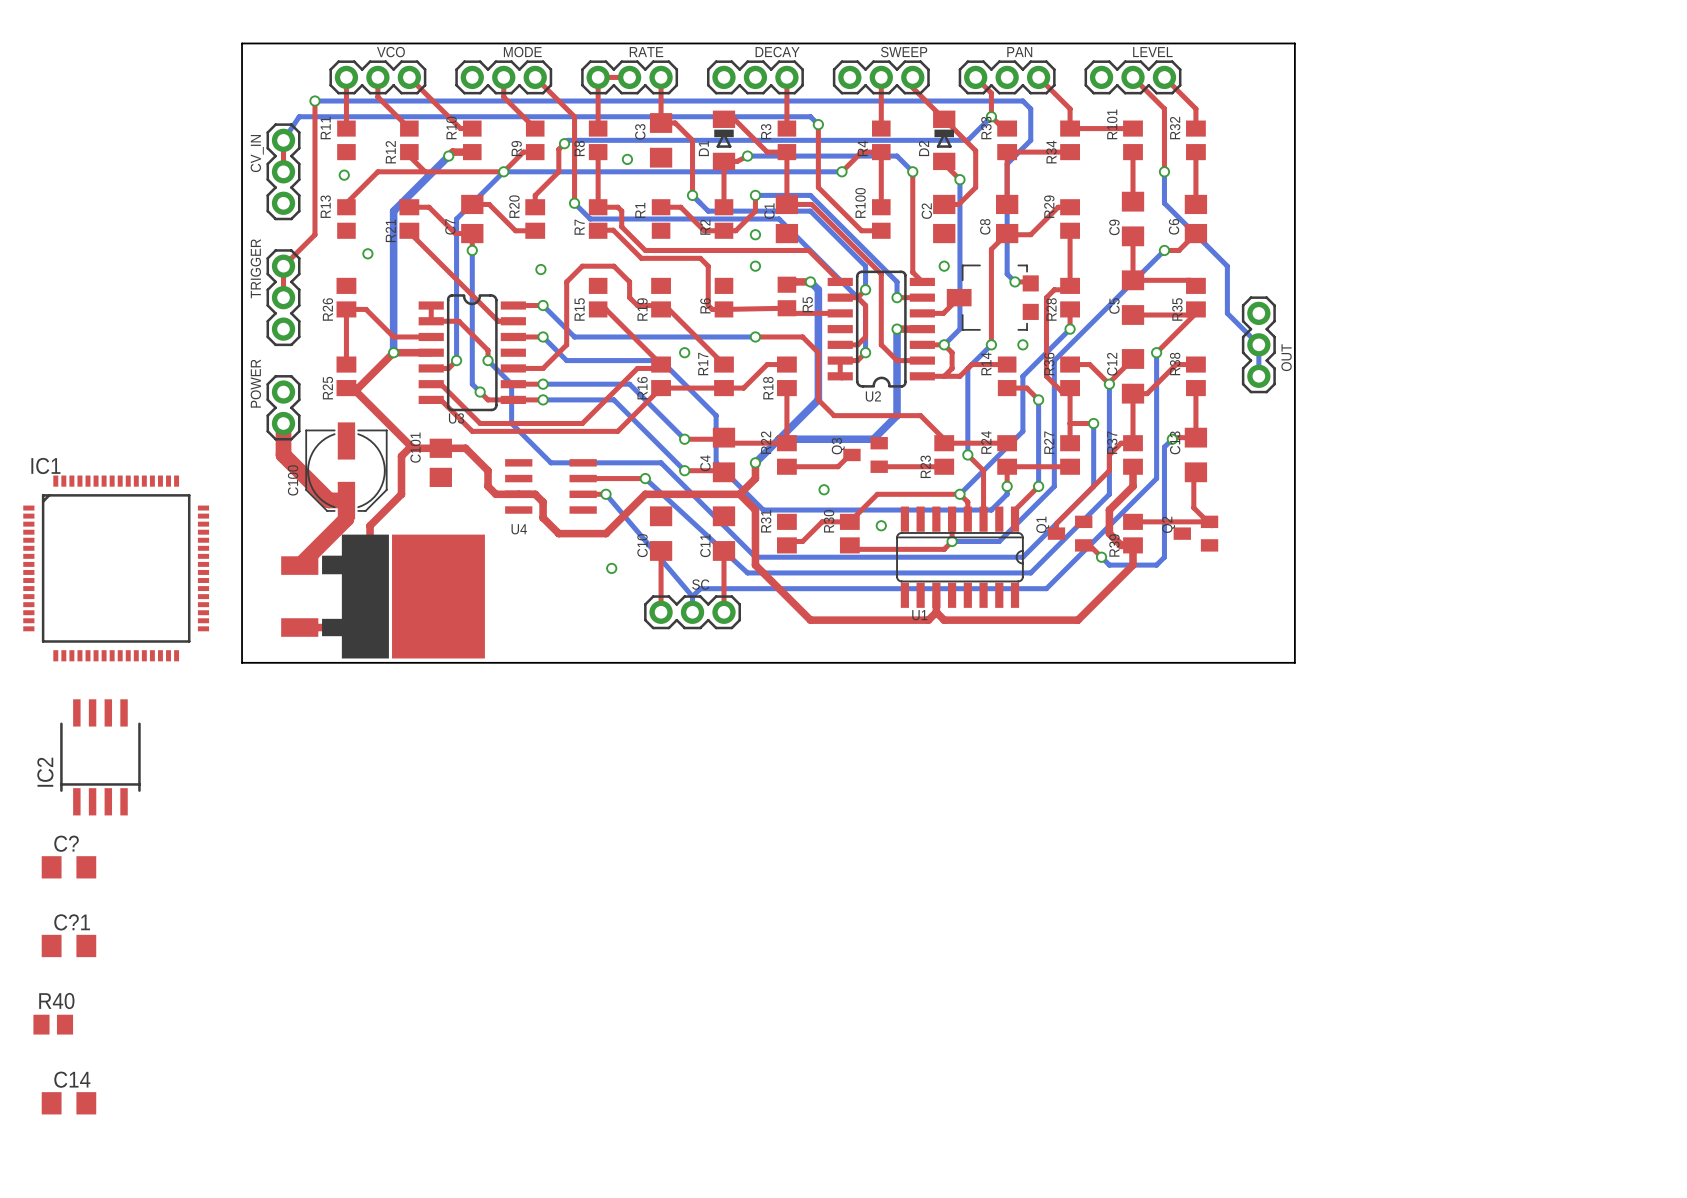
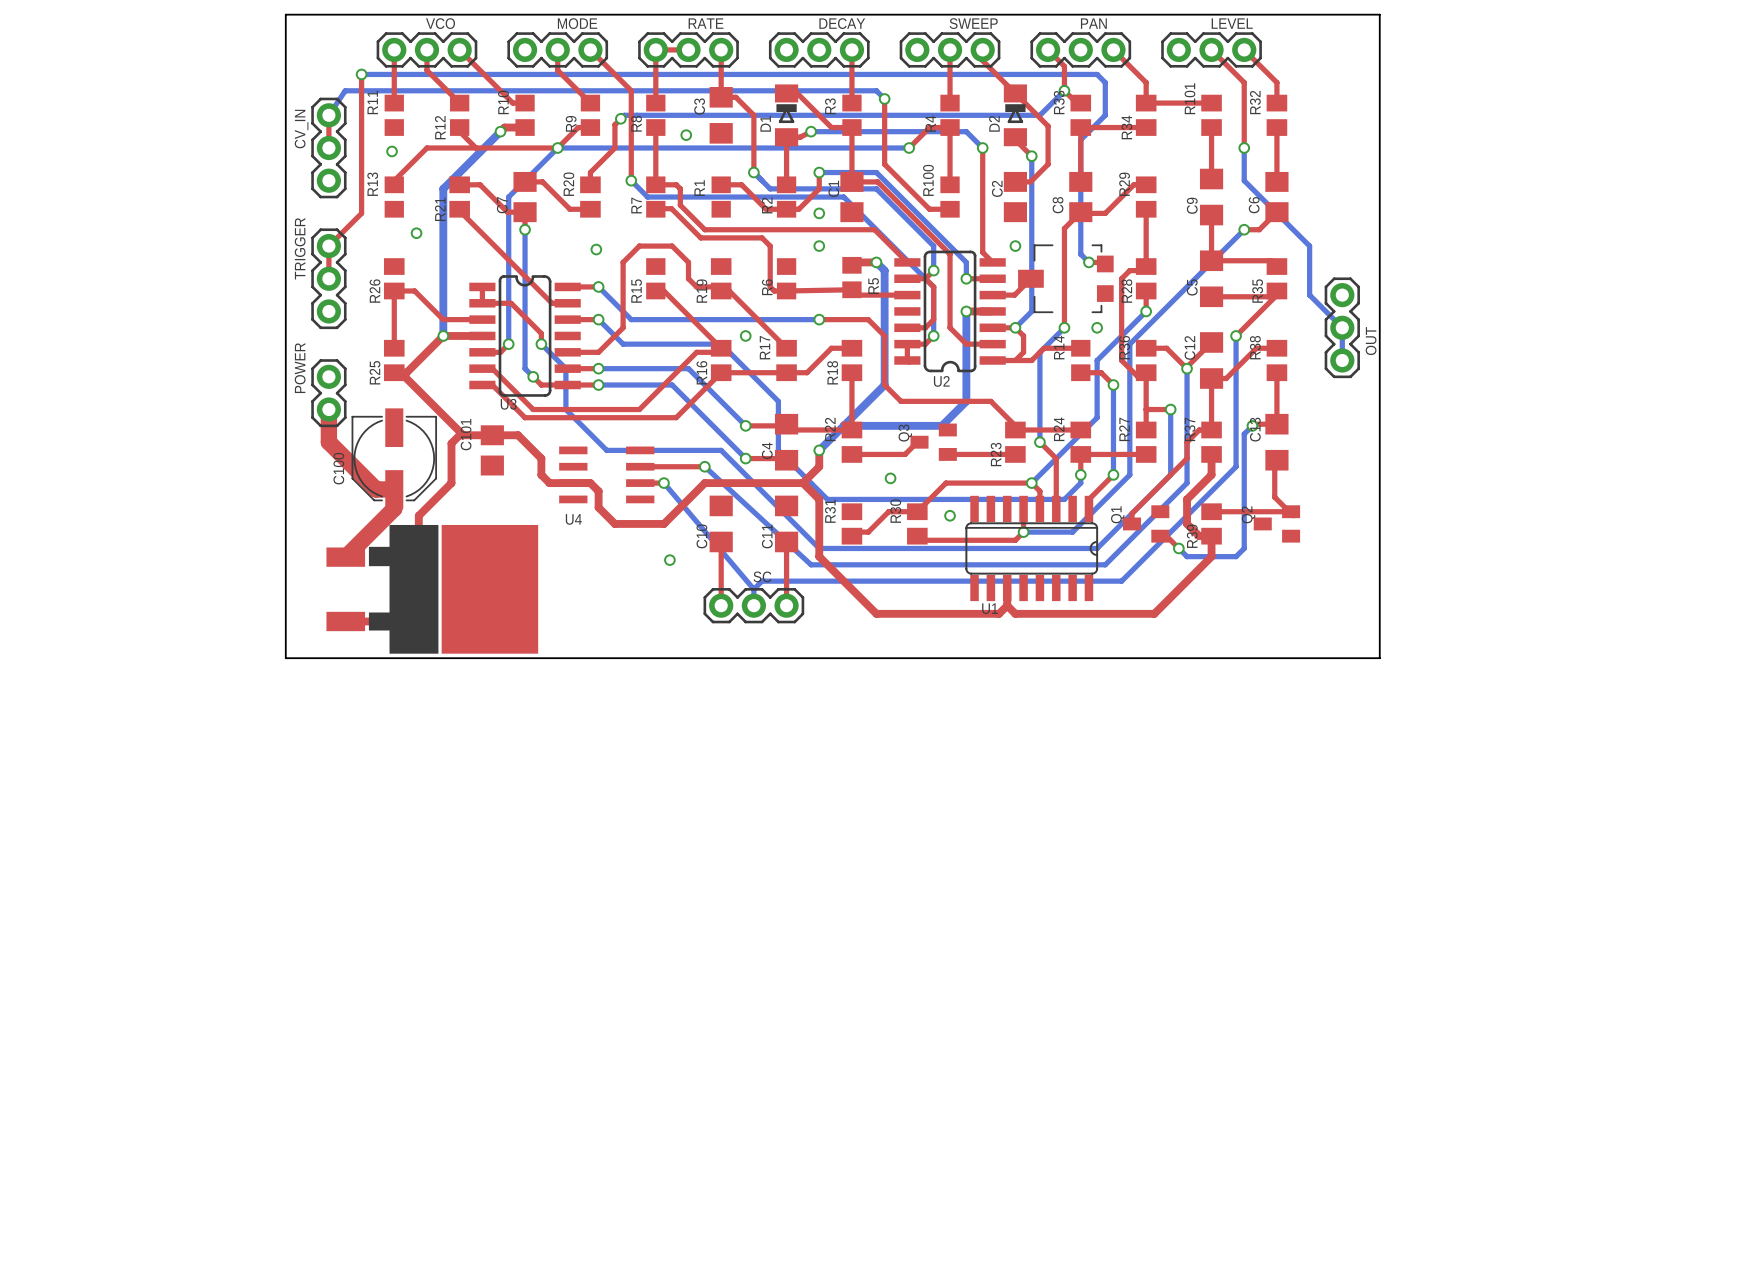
IC1: (116, 568) -> none
IC2: (100, 757) -> none
C?: (68, 867) -> none
C?1: (68, 945) -> none
R40: (53, 1024) -> none
C14: (68, 1103) -> none

